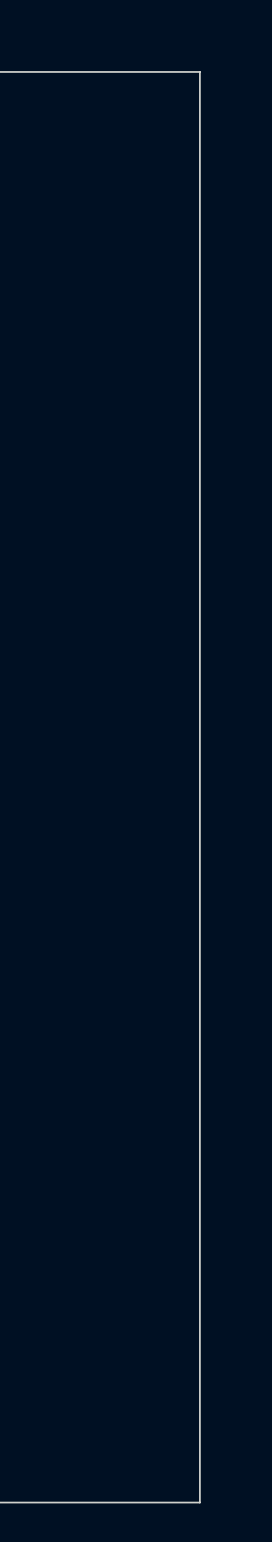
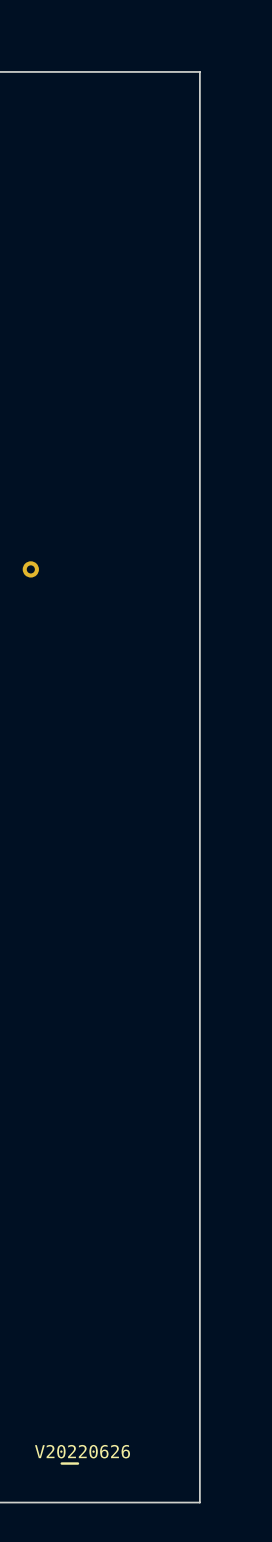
part: none -> (30, 569)
drawing: none -> [60, 1462, 80, 1465]

